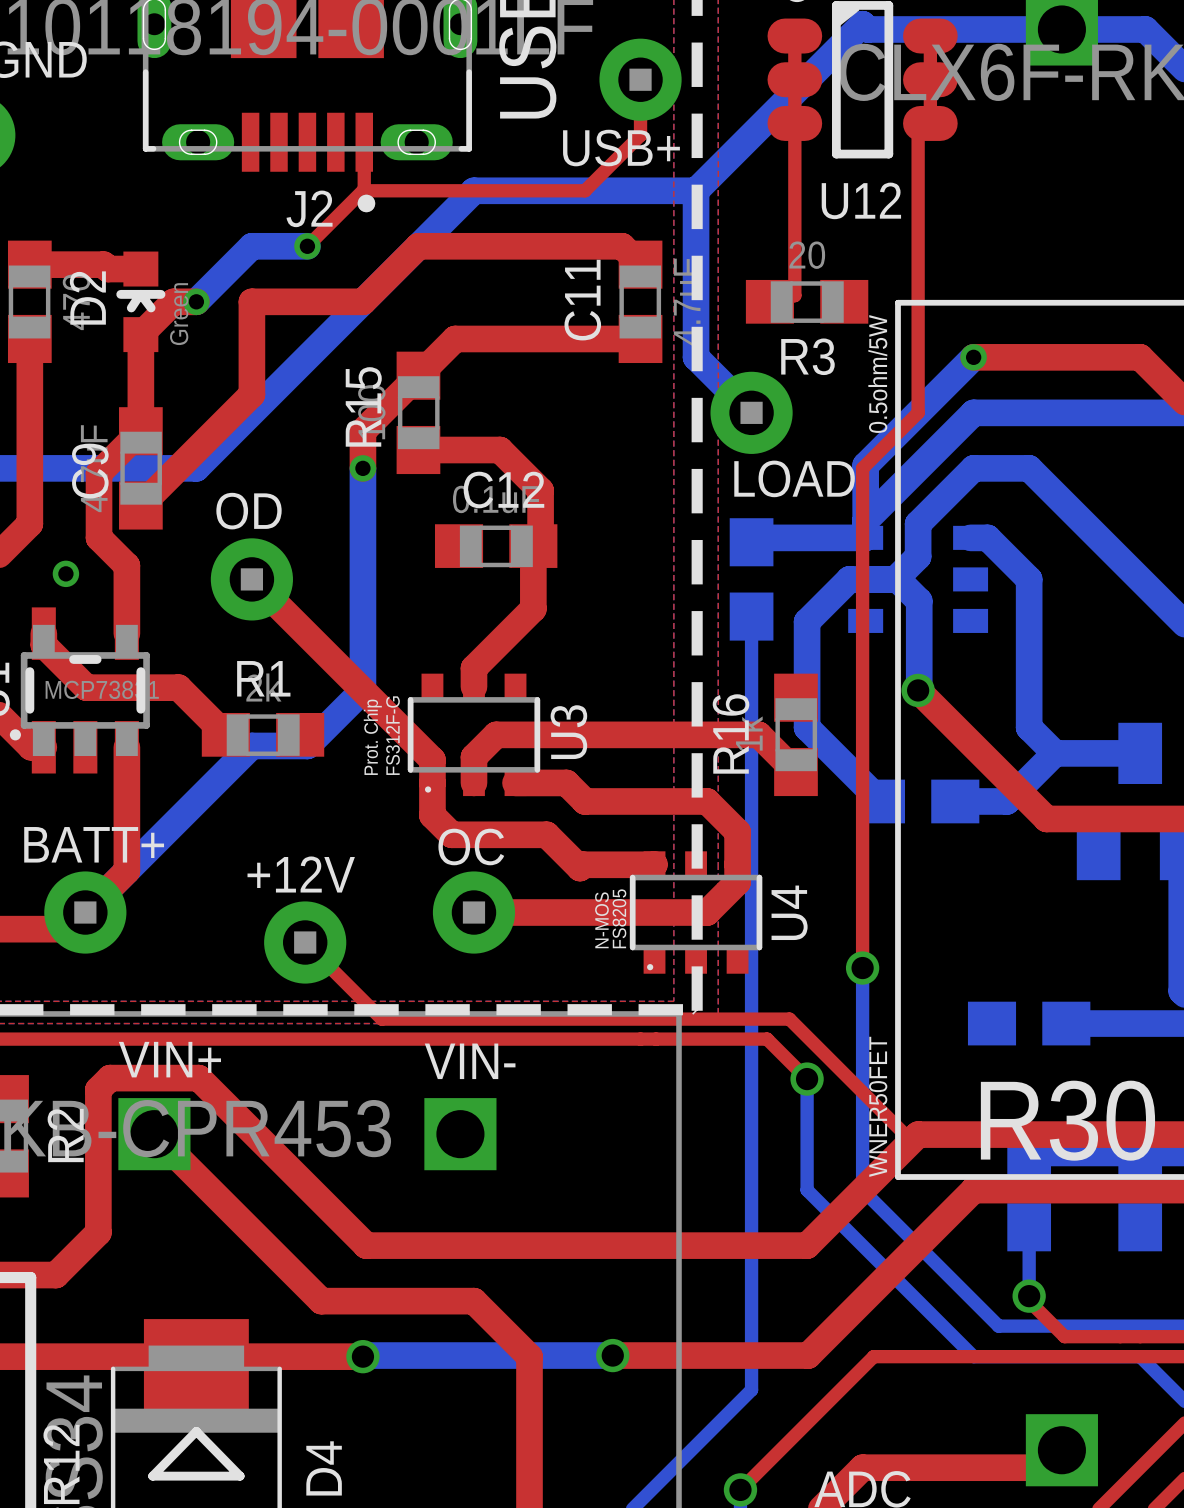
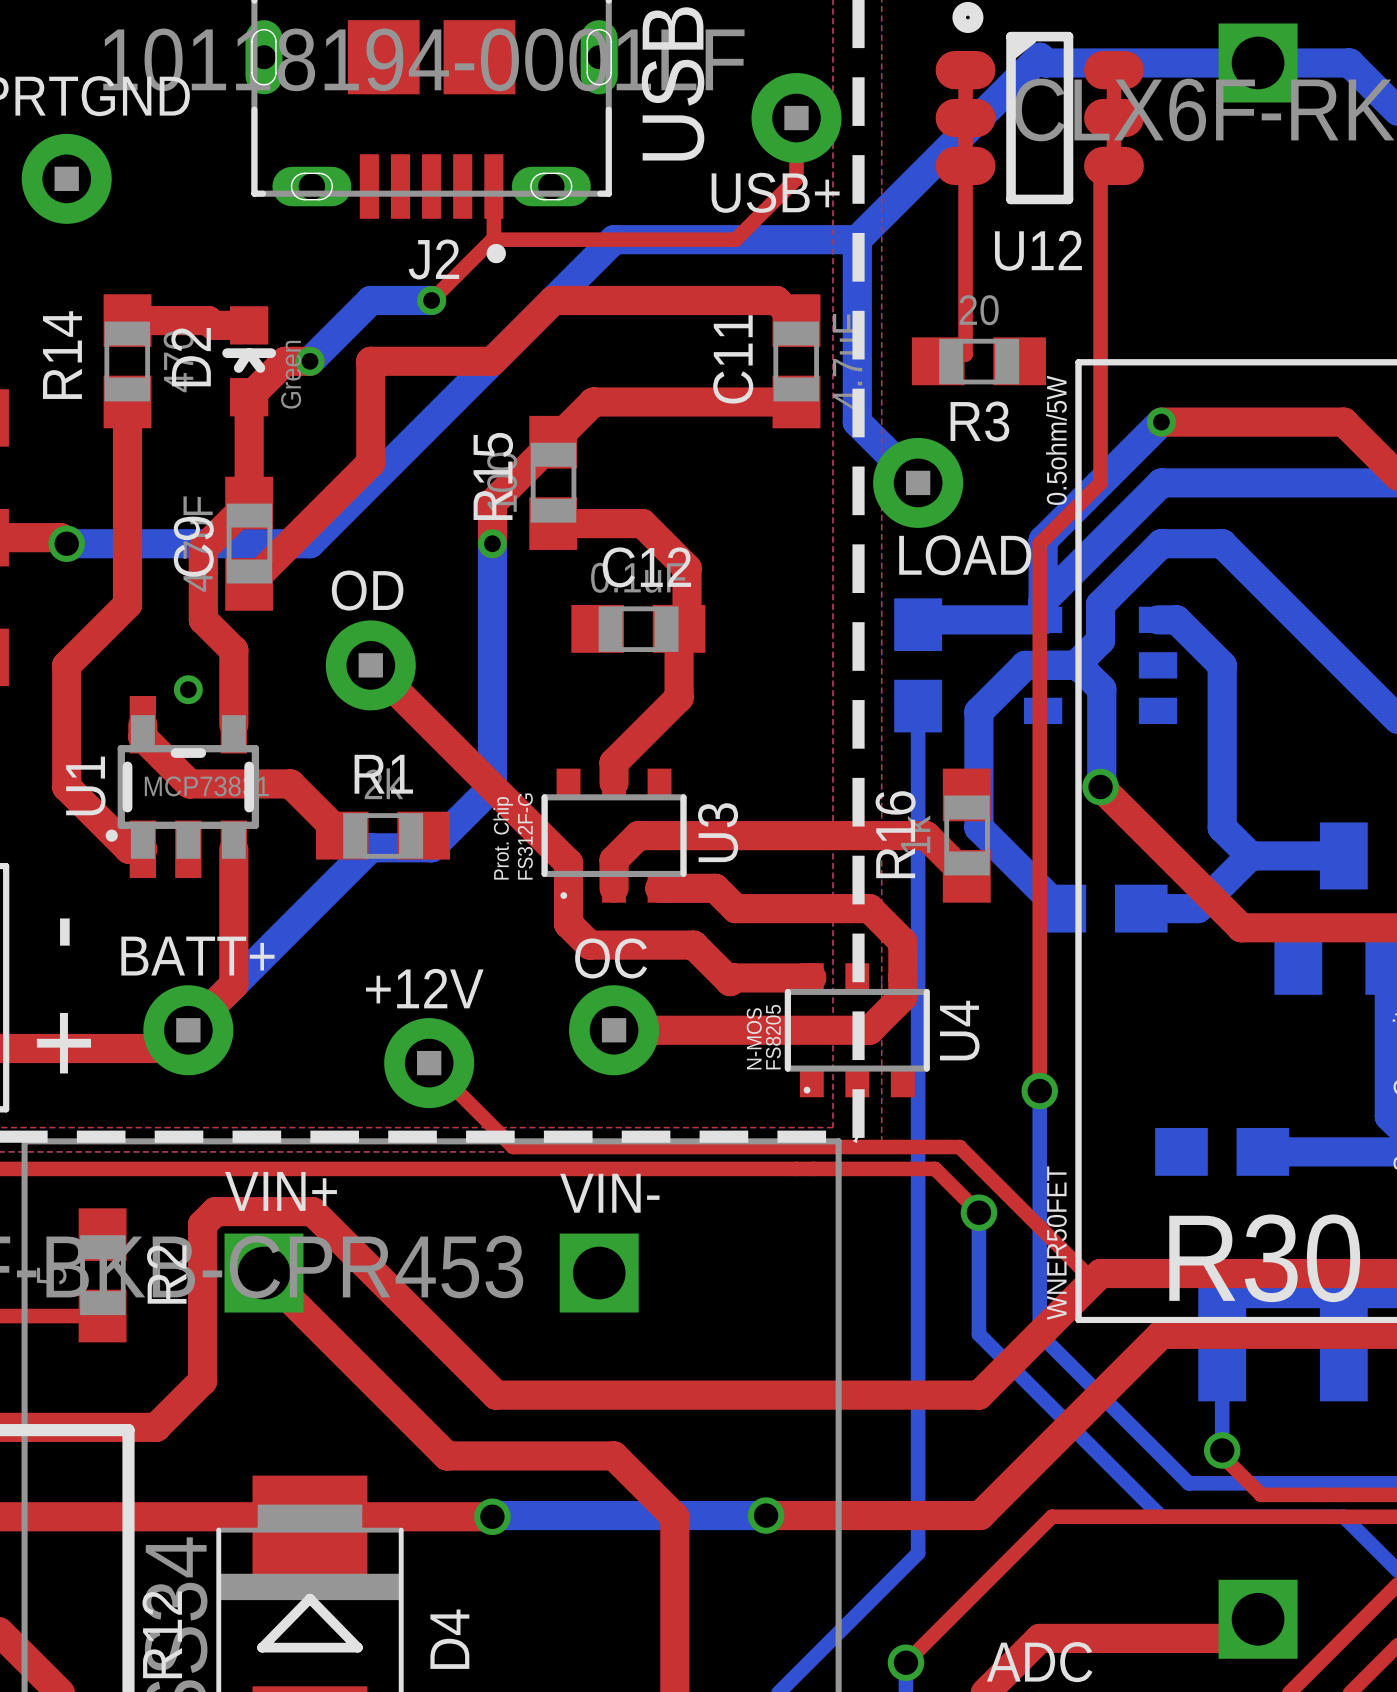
via position: (65, 573) -> (188, 689)

